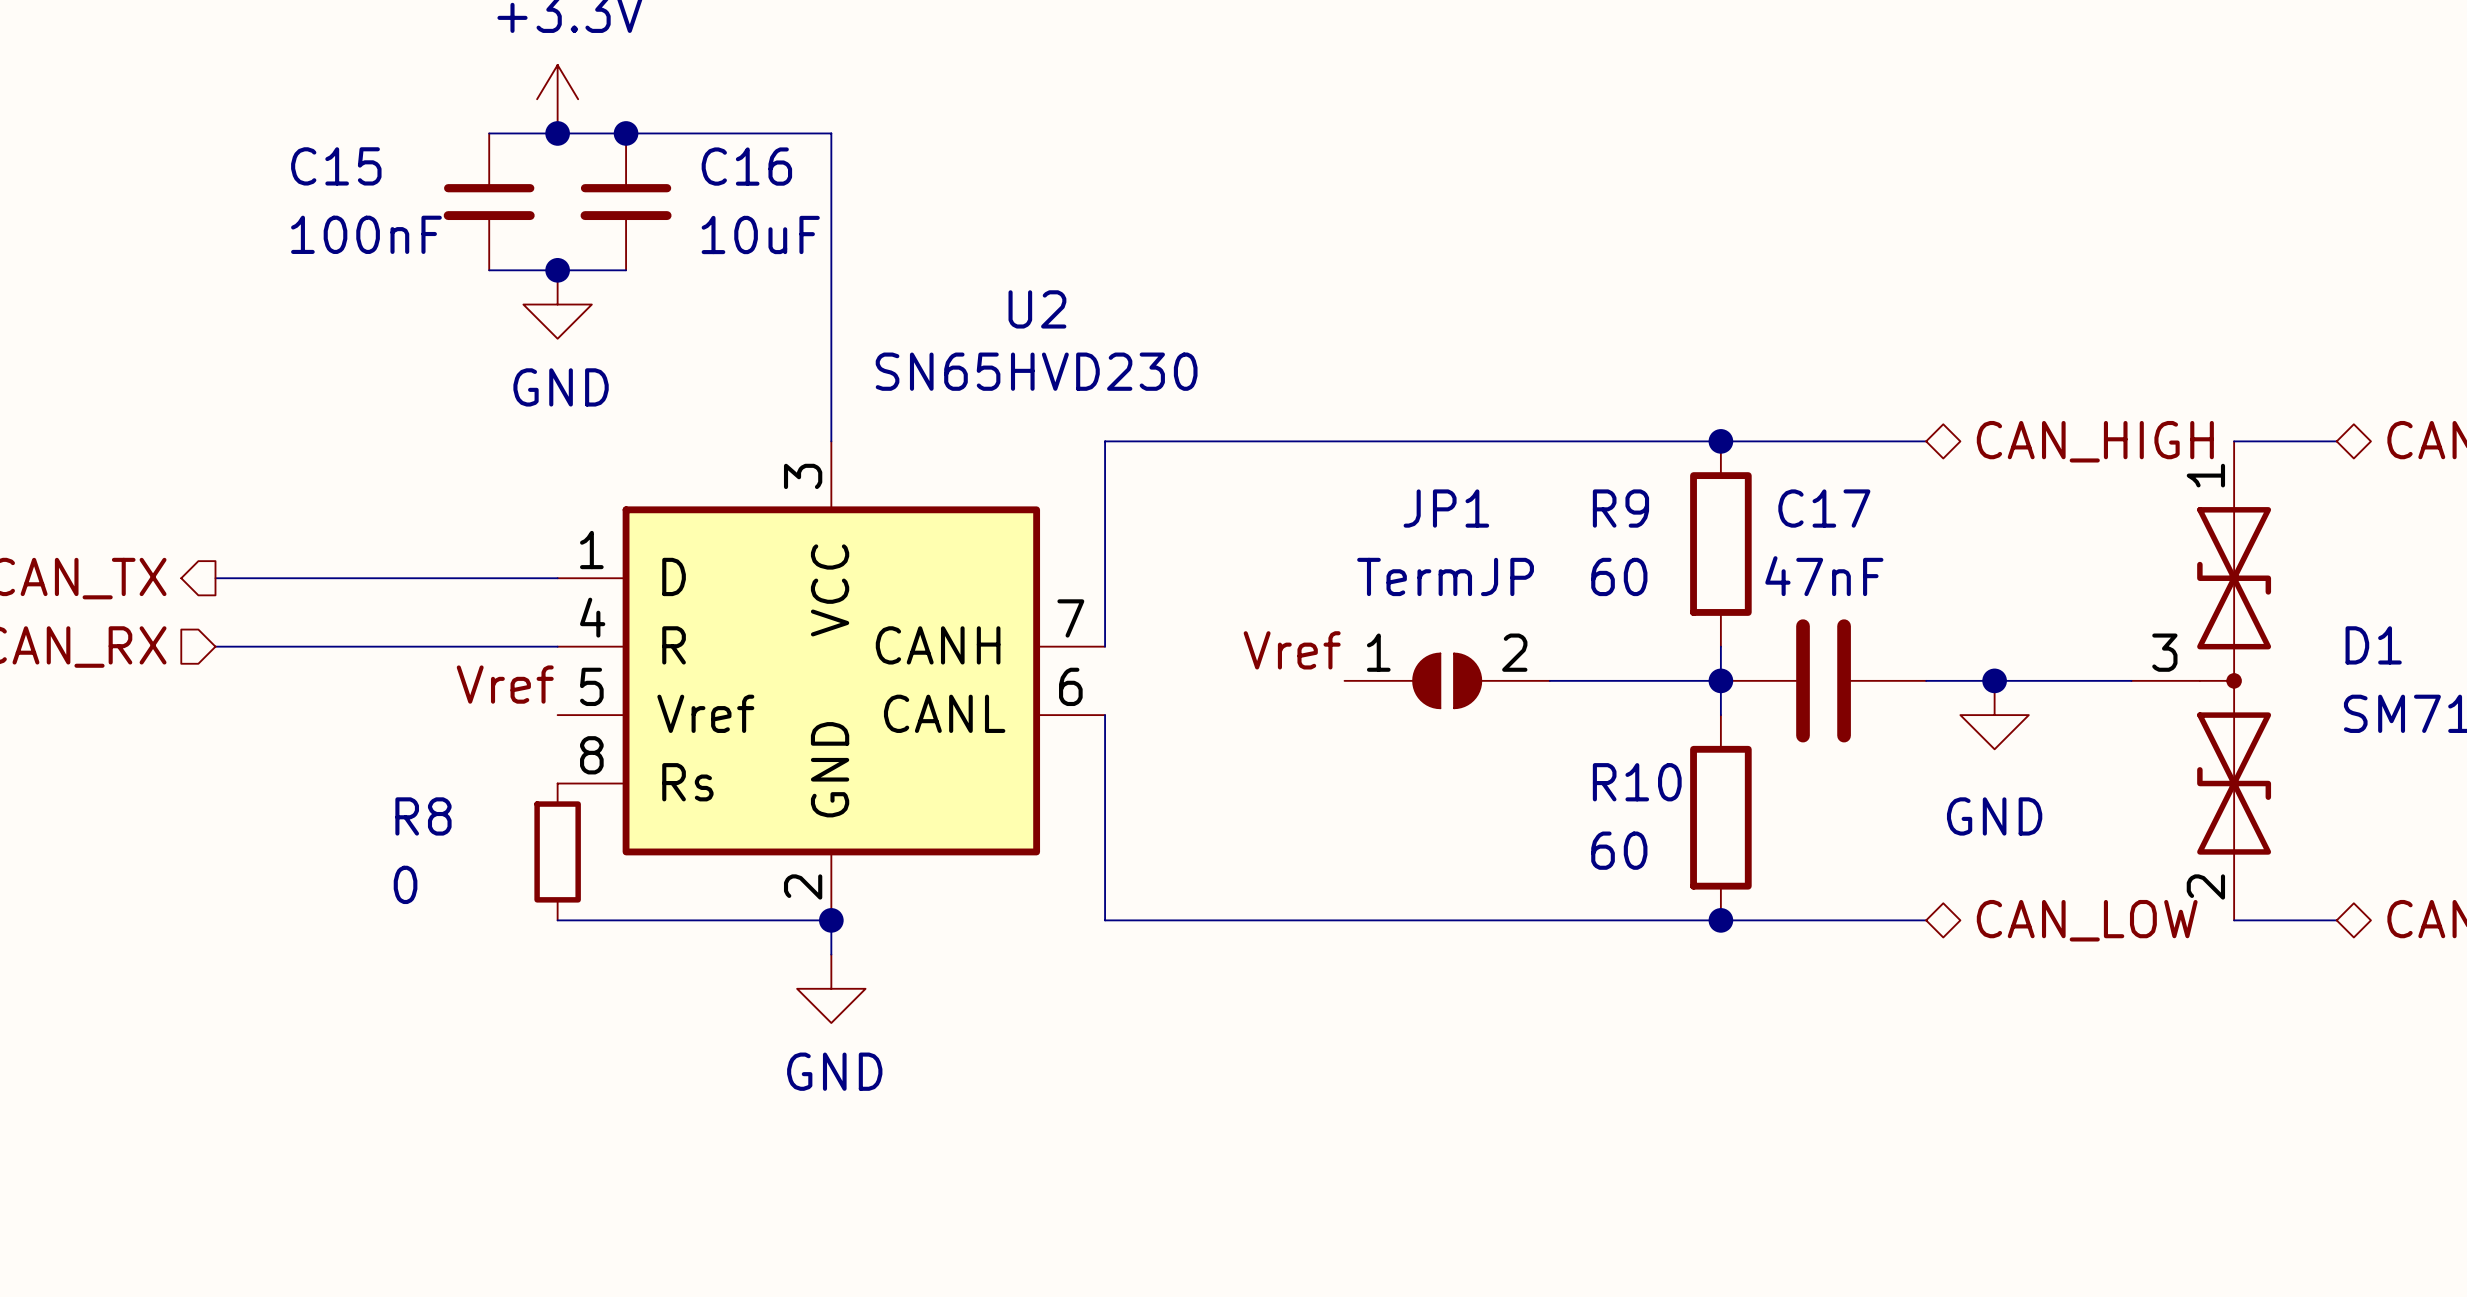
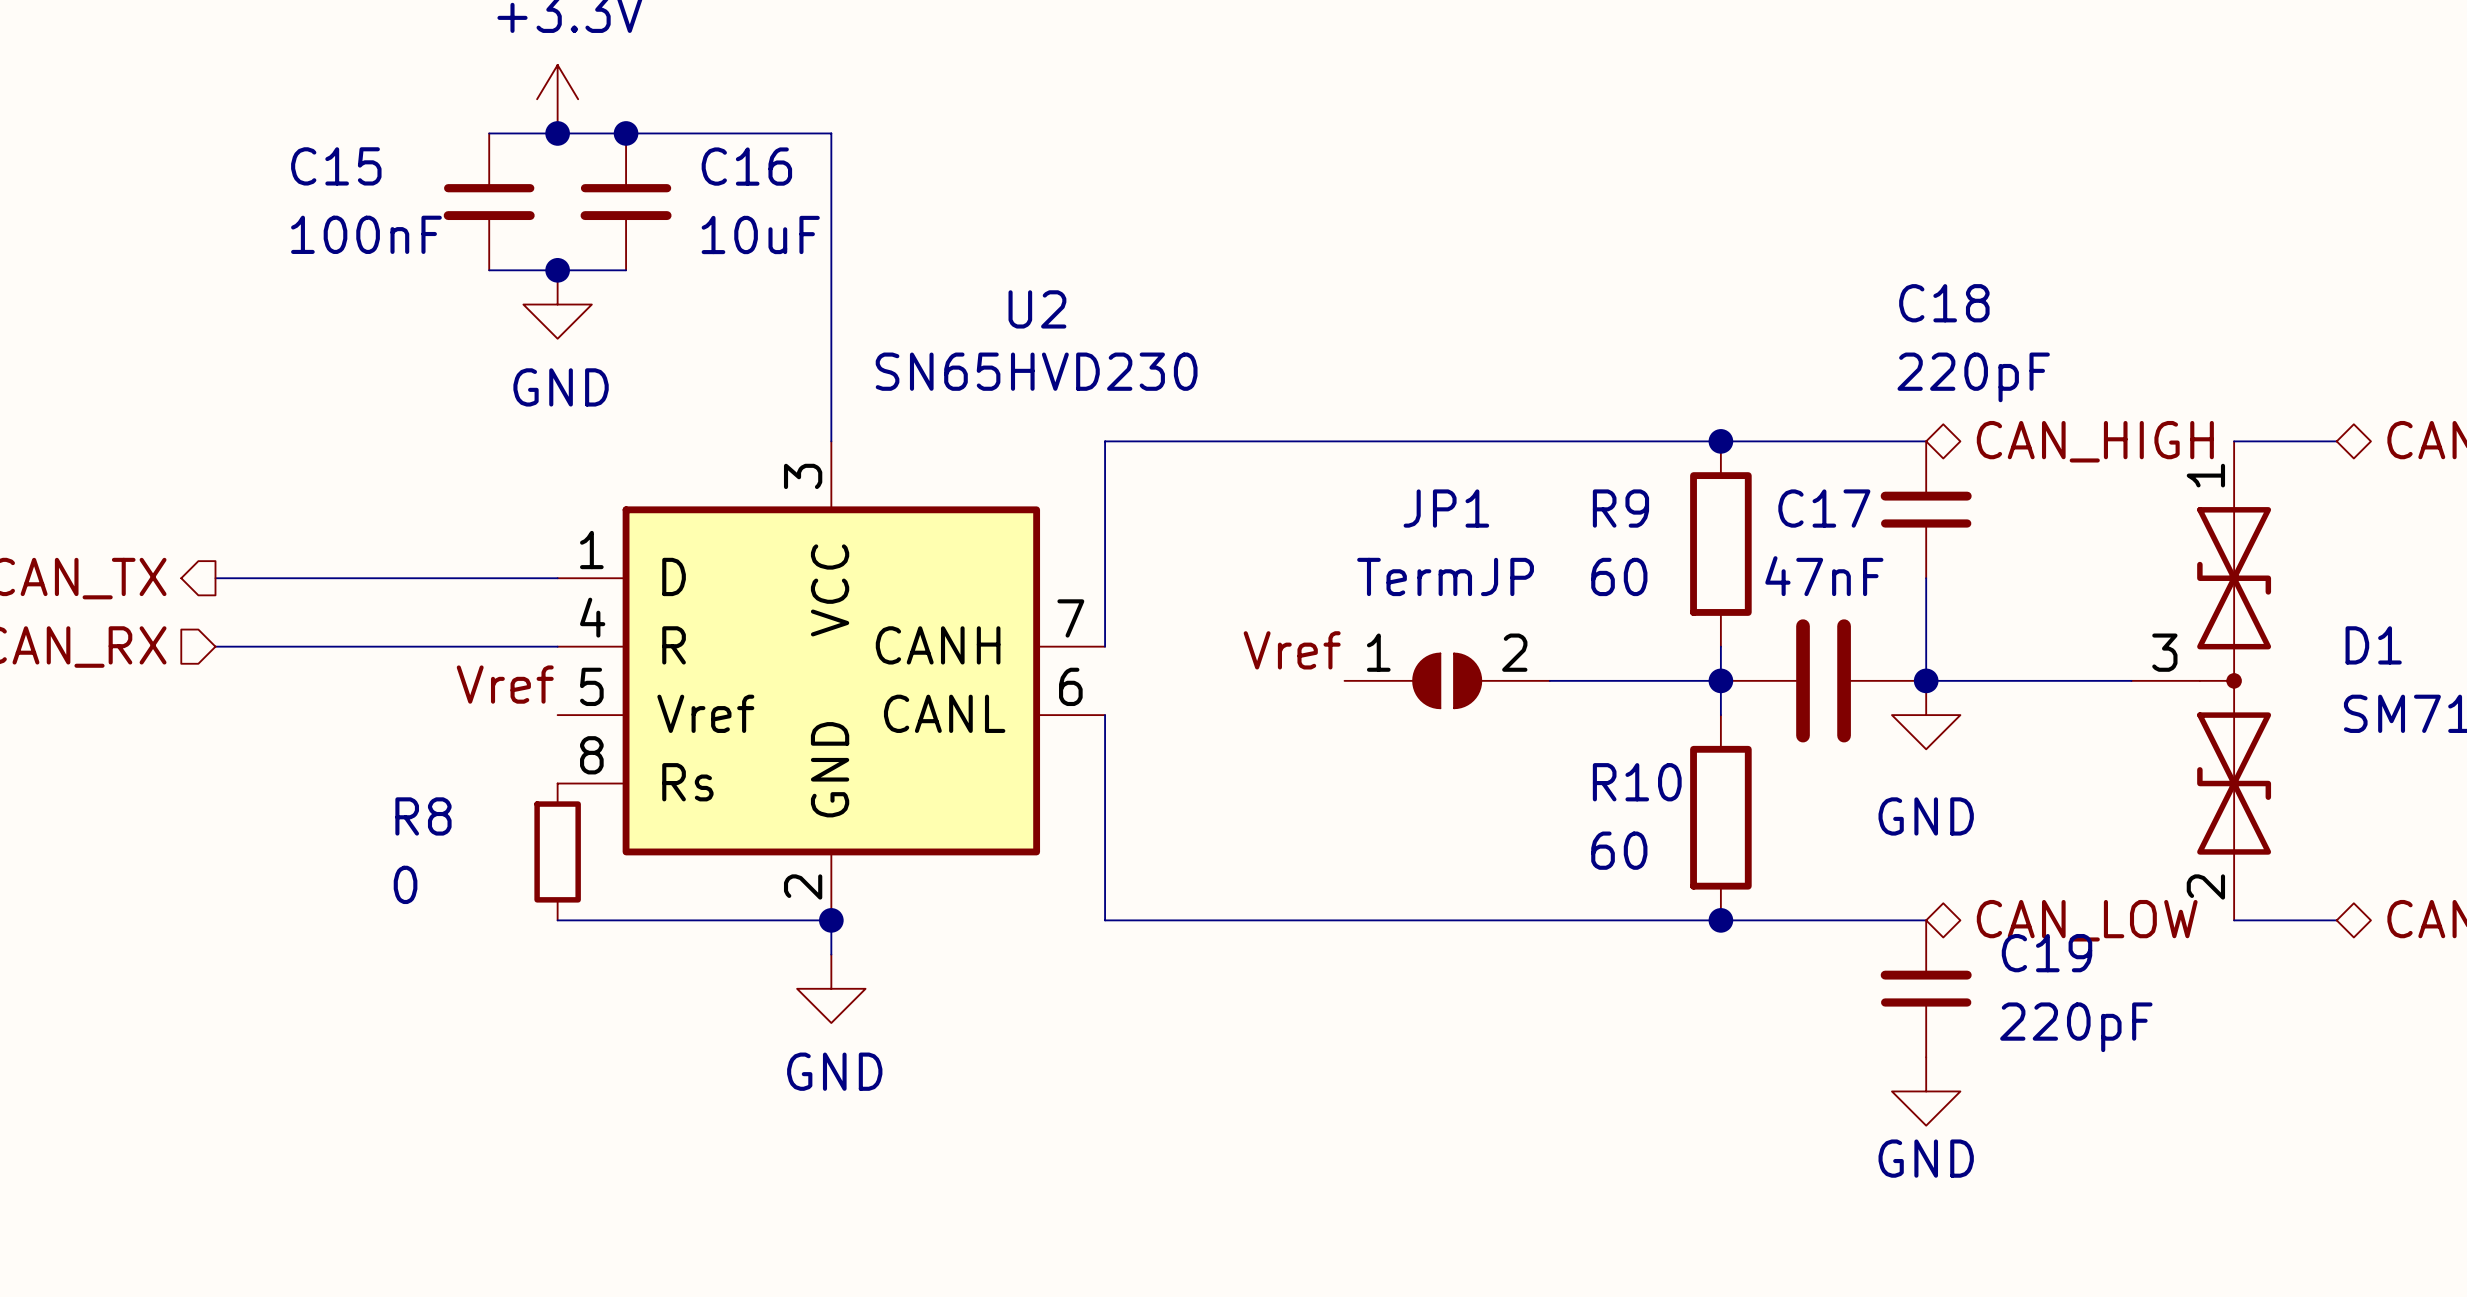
C18: none -> 220pF (1926, 509)
wire: none -> (1926, 578) (1926, 680)
junction position: (1994, 680) -> (1926, 680)
power symbol position: GND (1994, 715) -> GND (1926, 715)
C19: none -> 220pF (1926, 988)
power symbol: none -> GND (1926, 1091)

